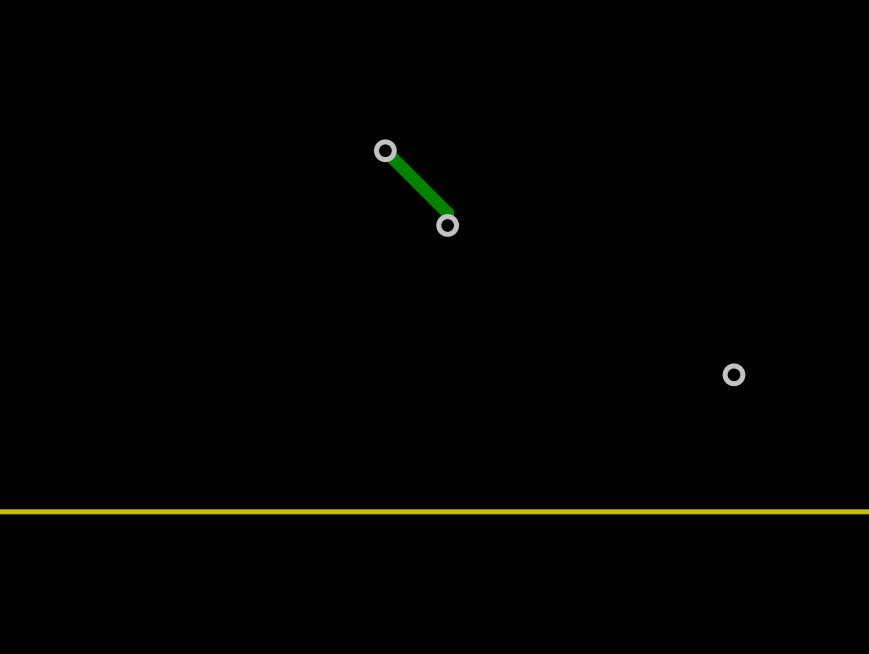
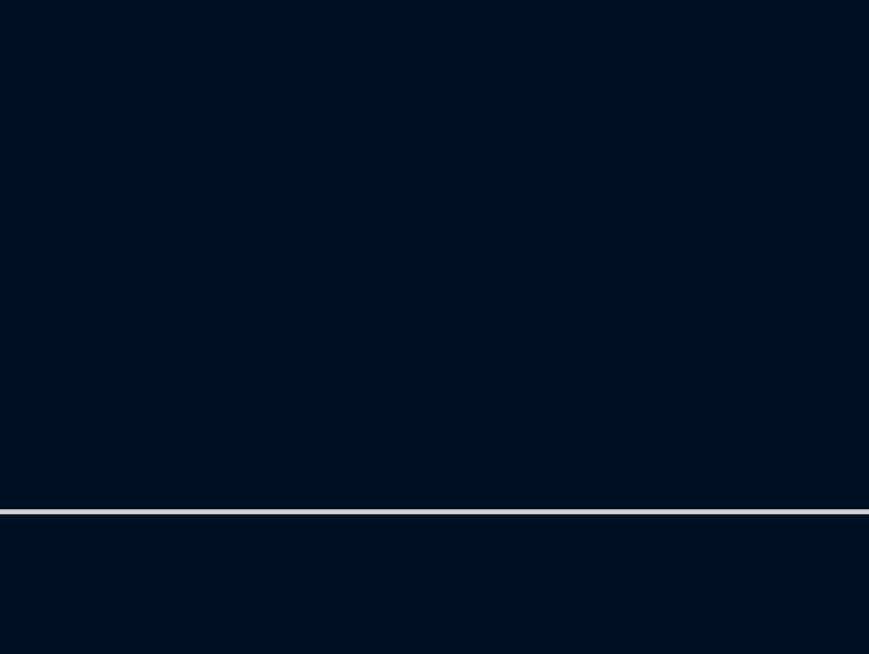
track: (385, 150) (447, 213) (447, 225) -> none
via: (385, 150) -> none
via: (447, 225) -> none
via: (733, 374) -> none

